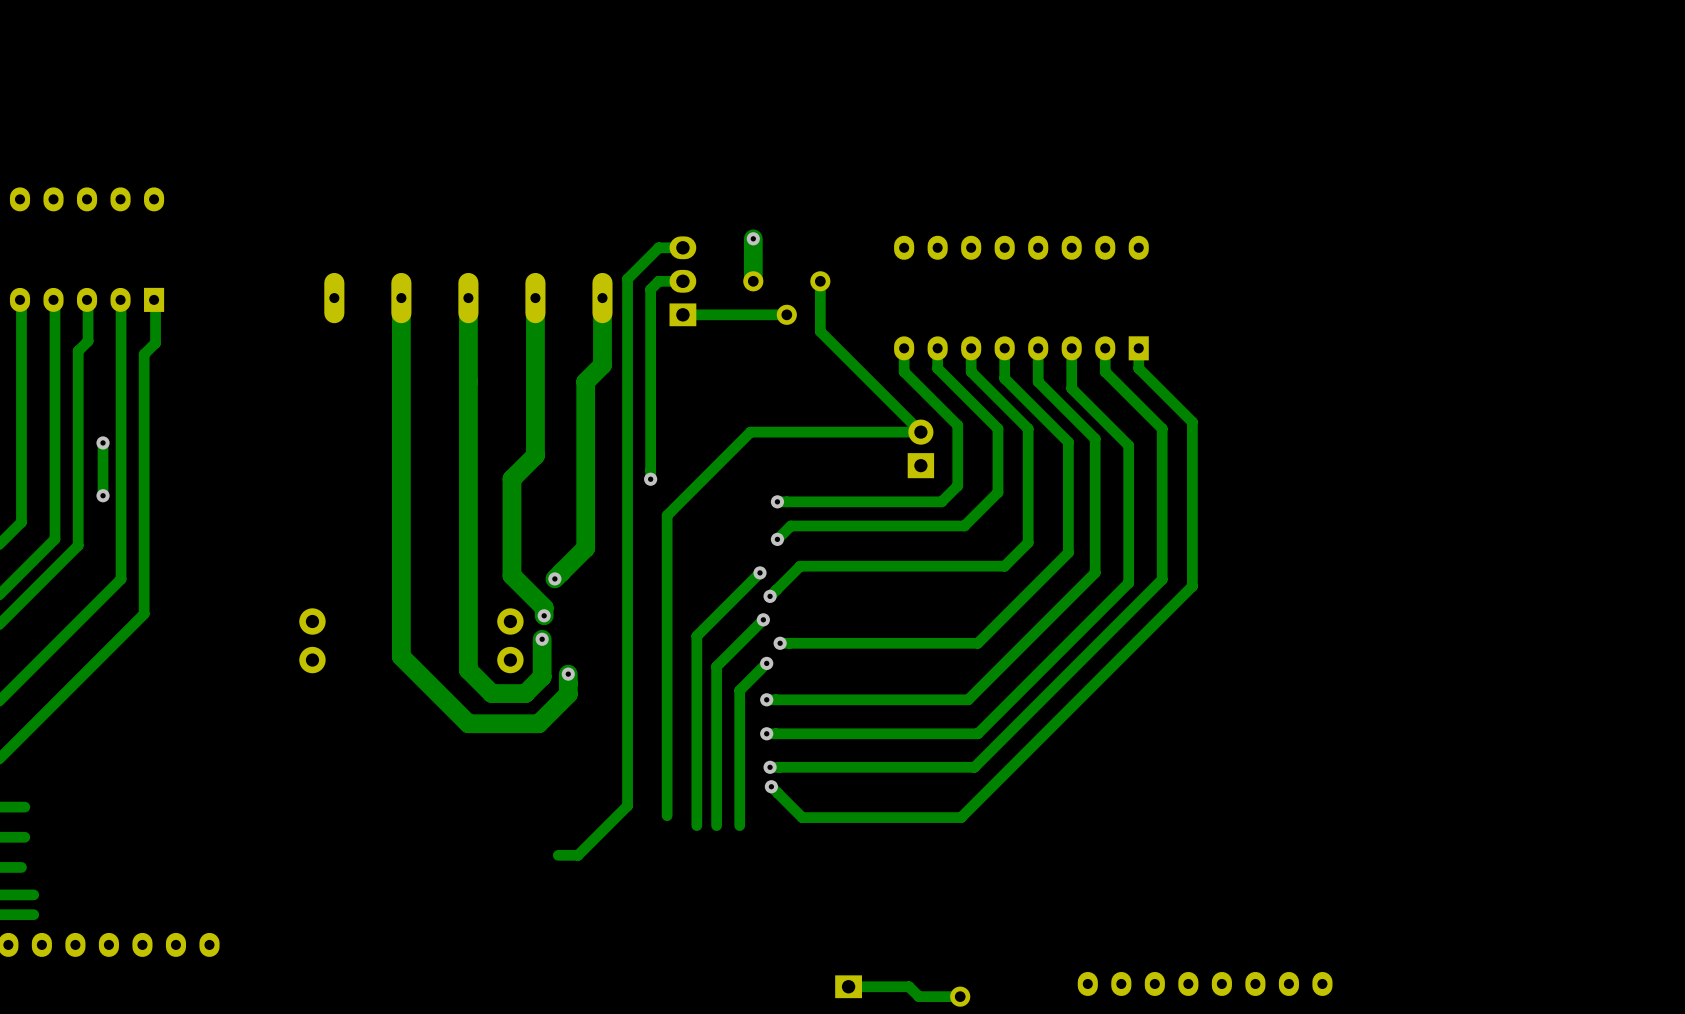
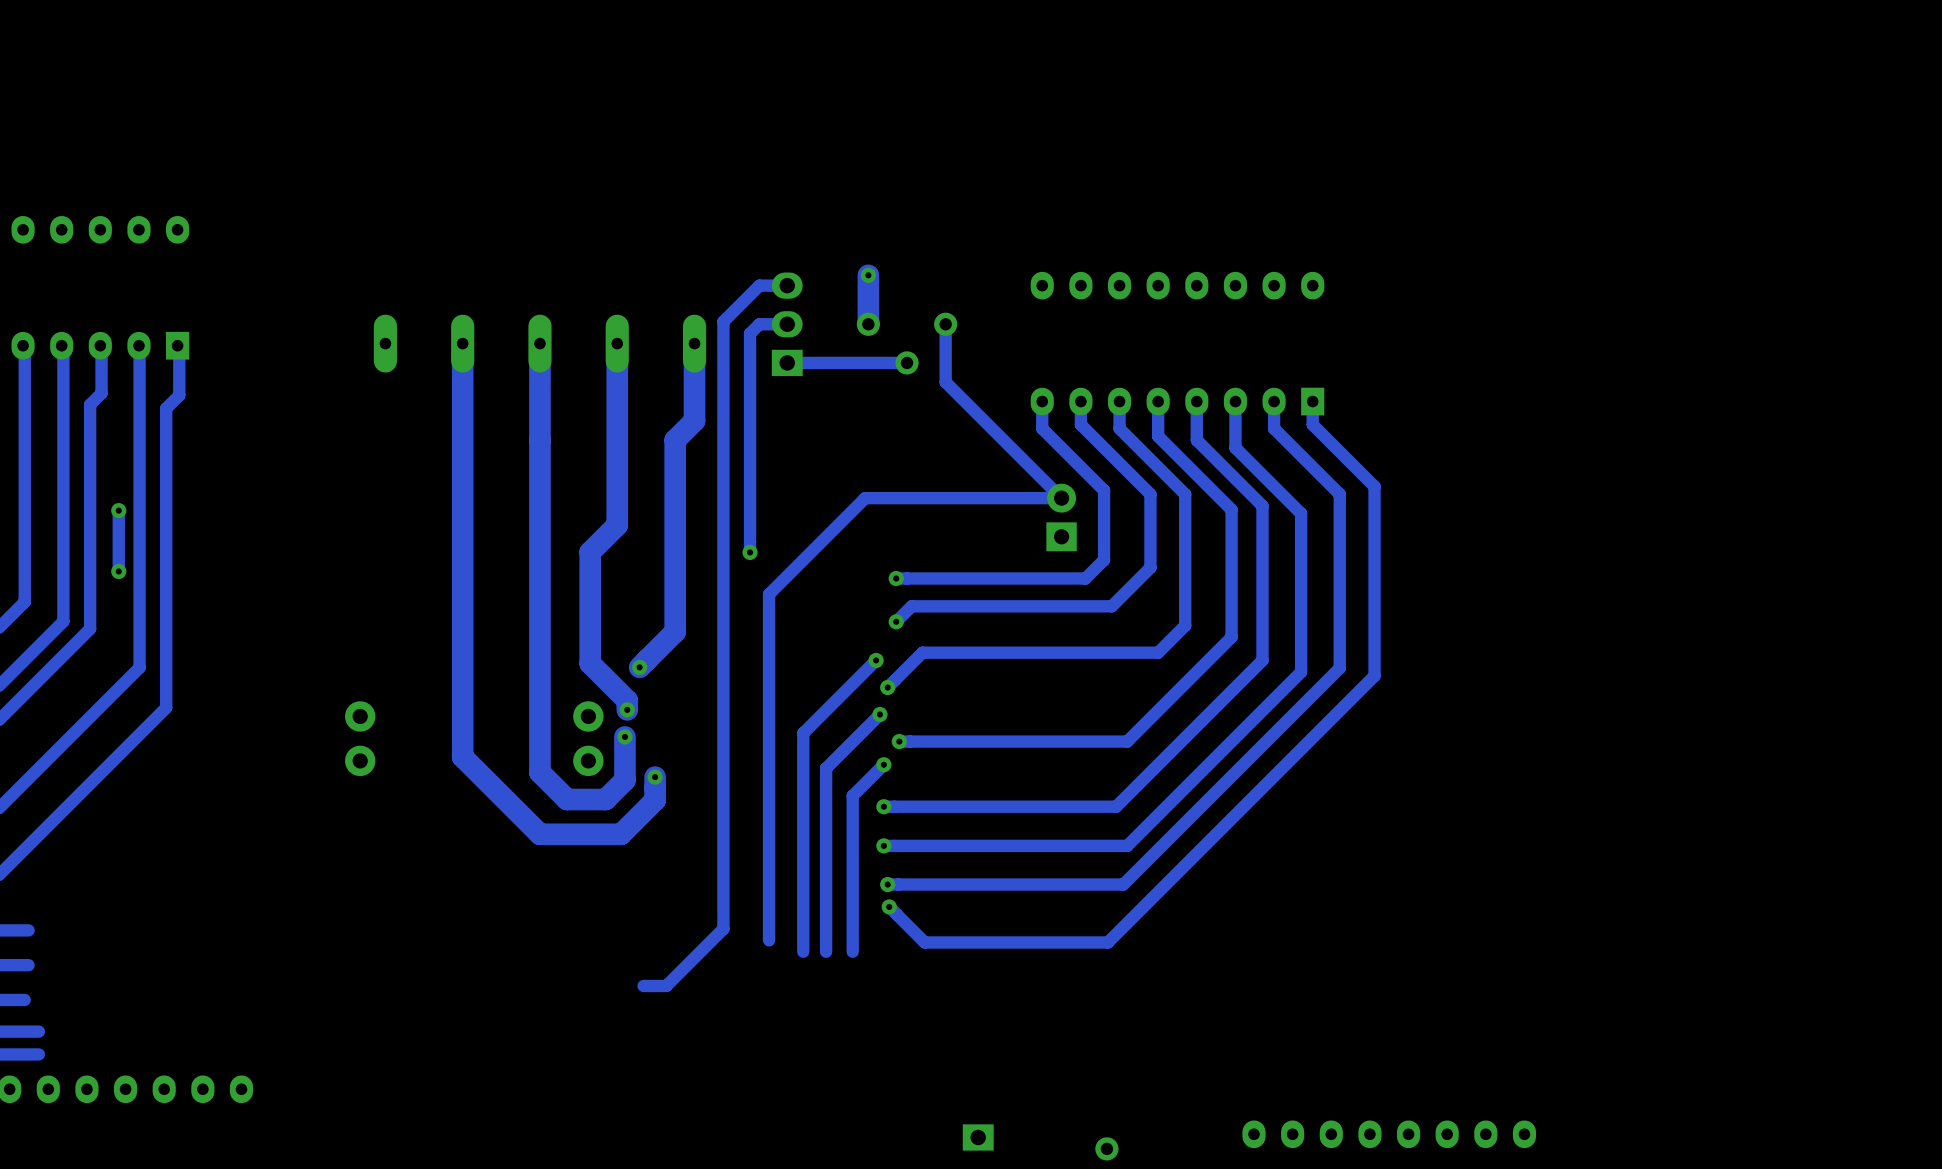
track: (848, 986) (909, 986) (918, 996) (960, 996) -> none

